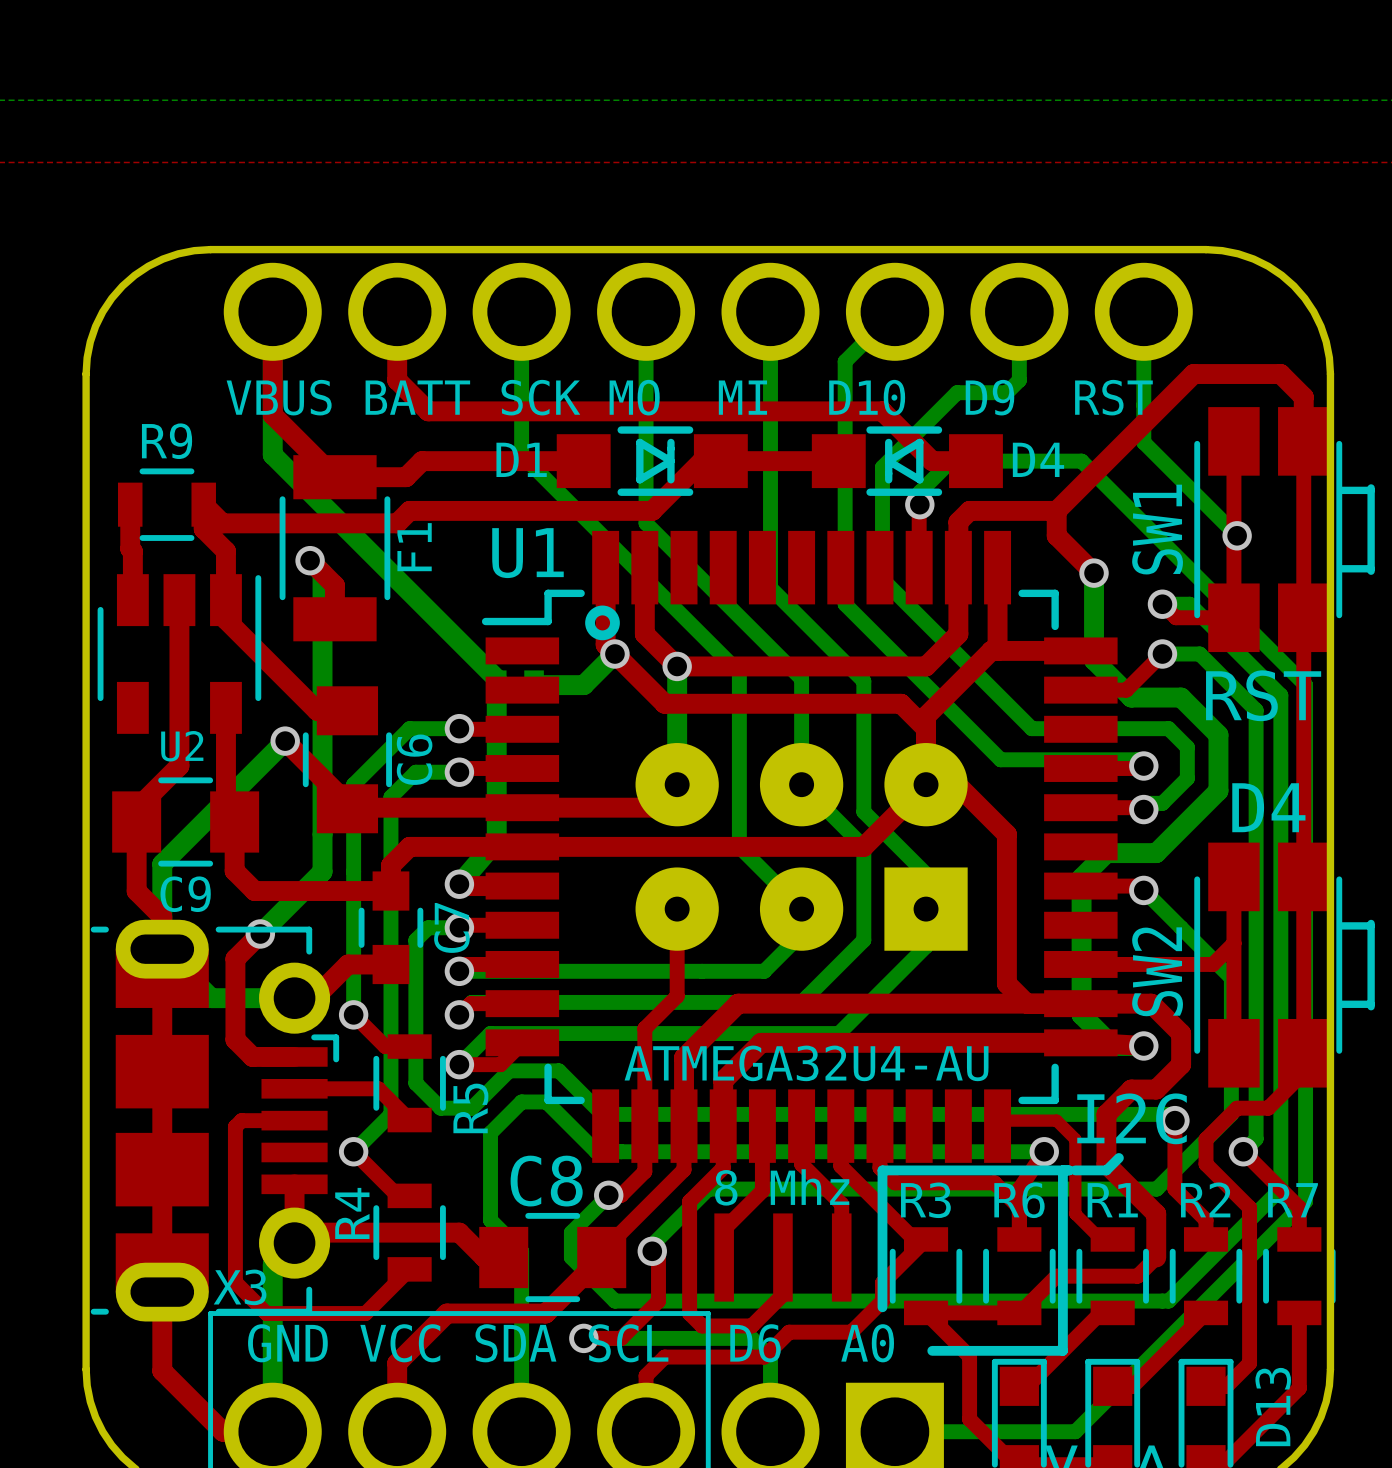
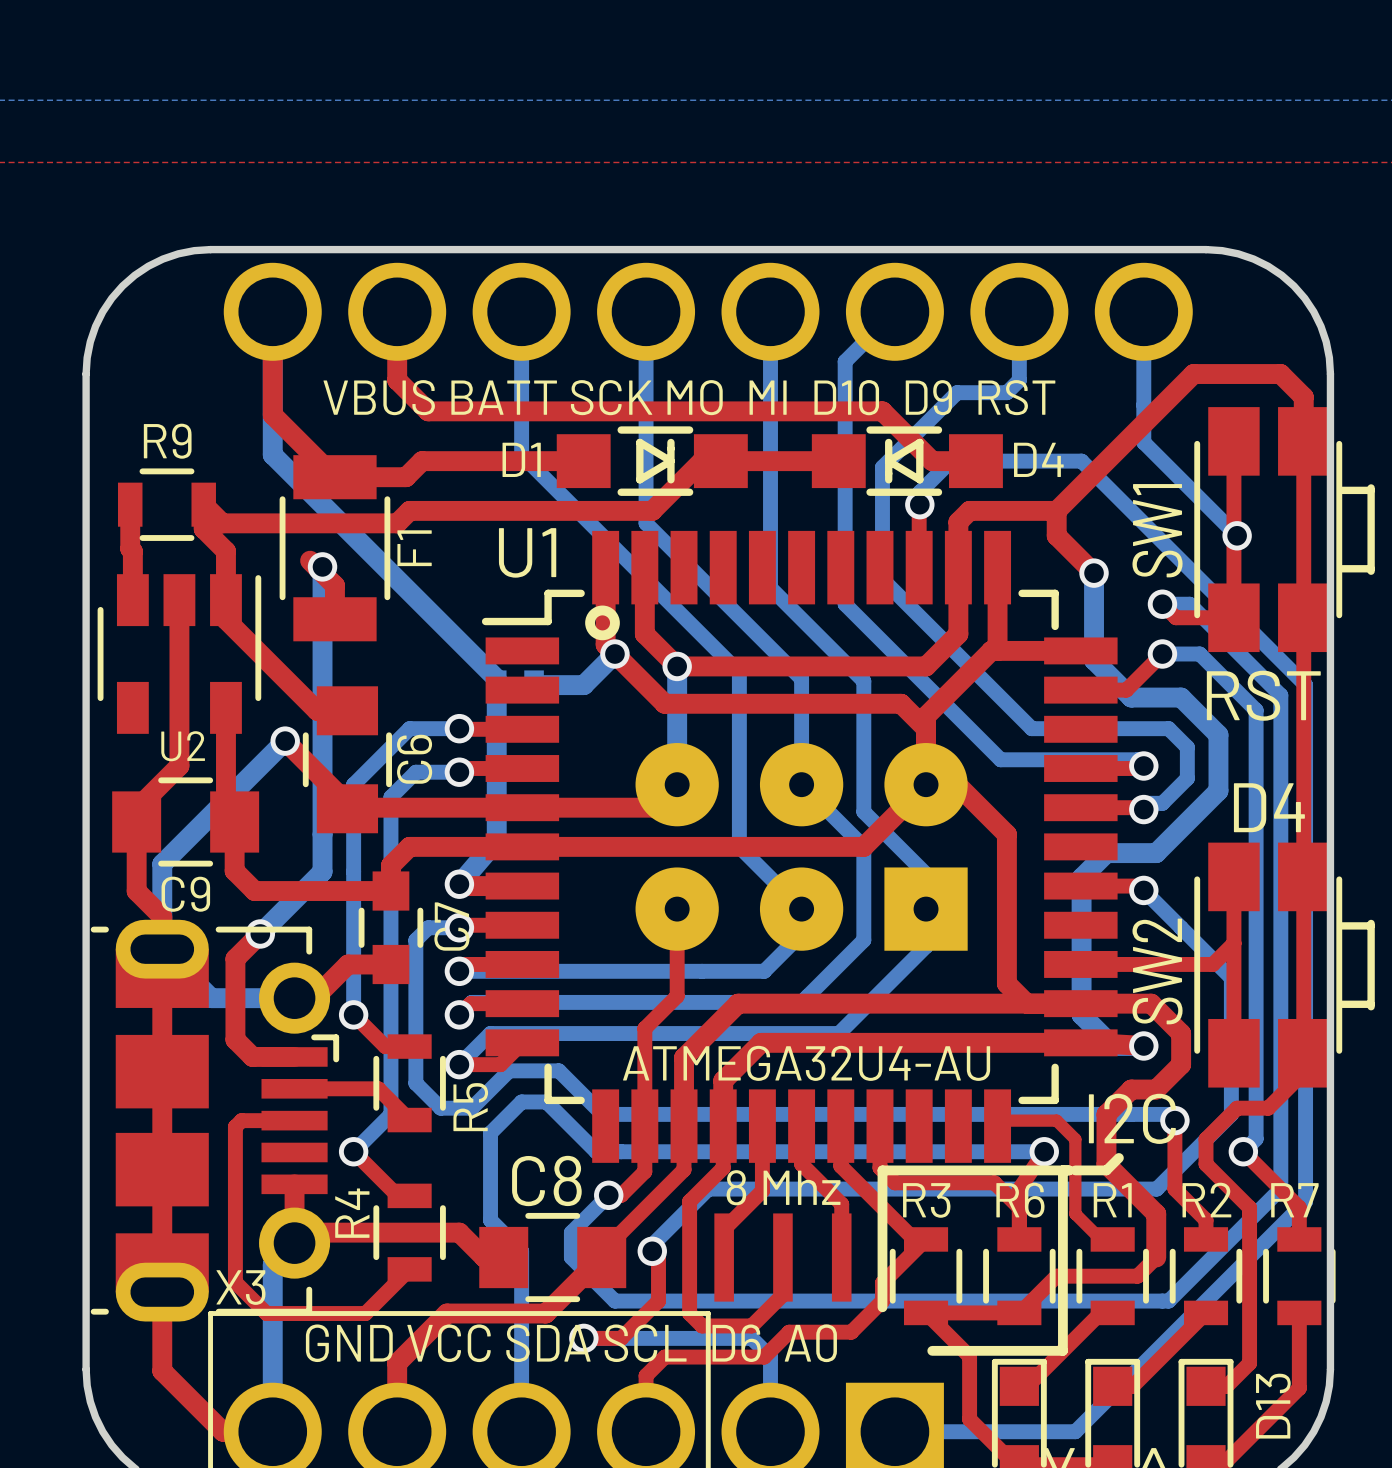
via position: (310, 560) -> (322, 566)

